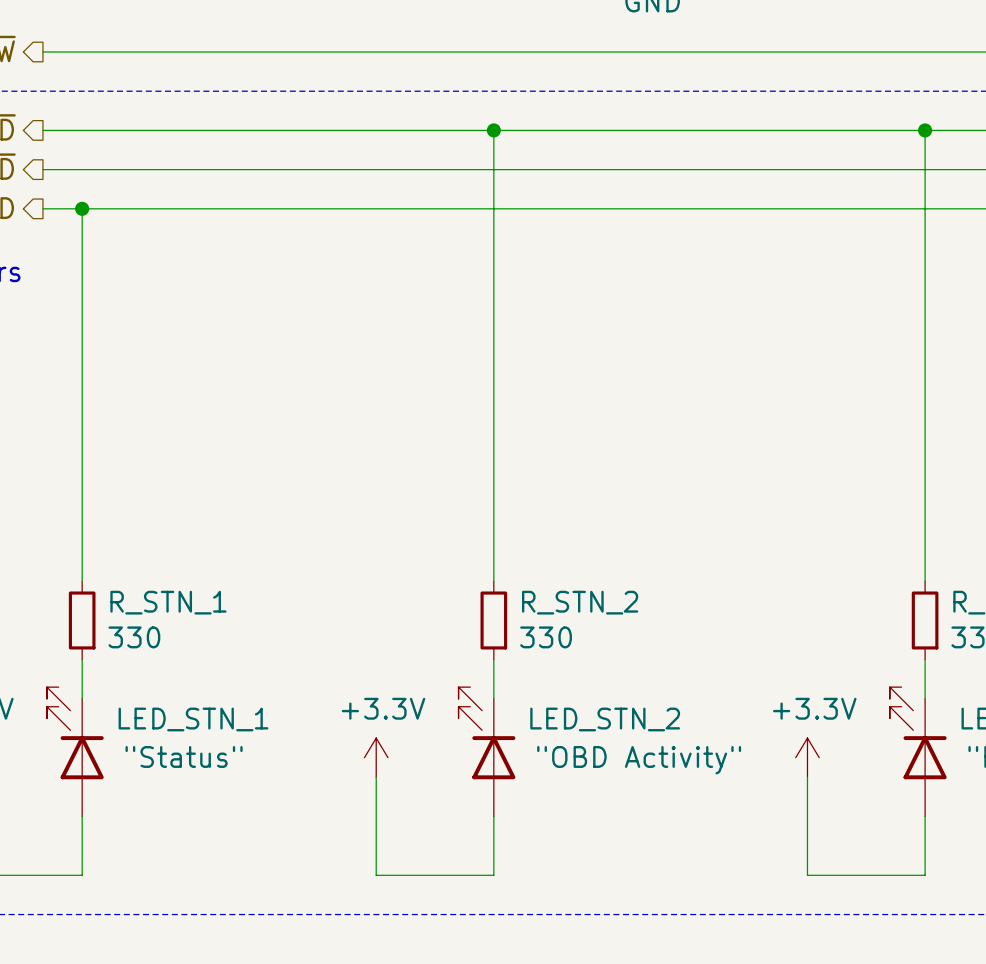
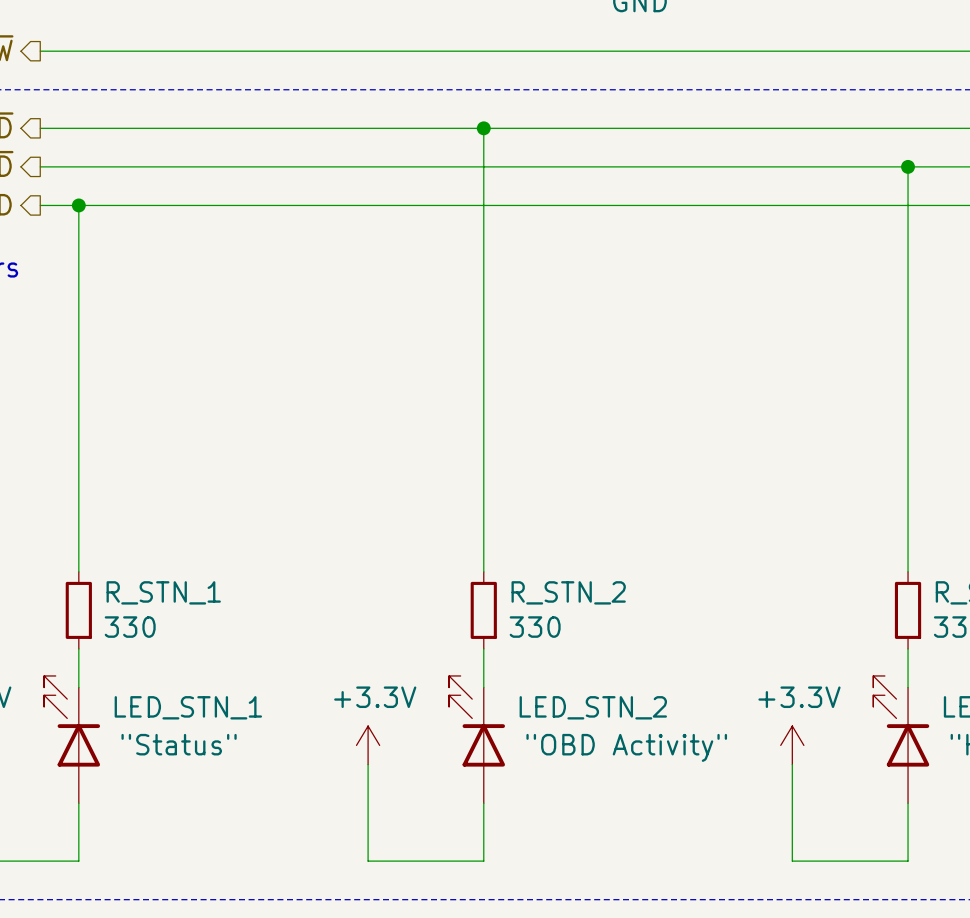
wire: (925, 130) (925, 169) -> none
junction position: (925, 130) -> (908, 166)

